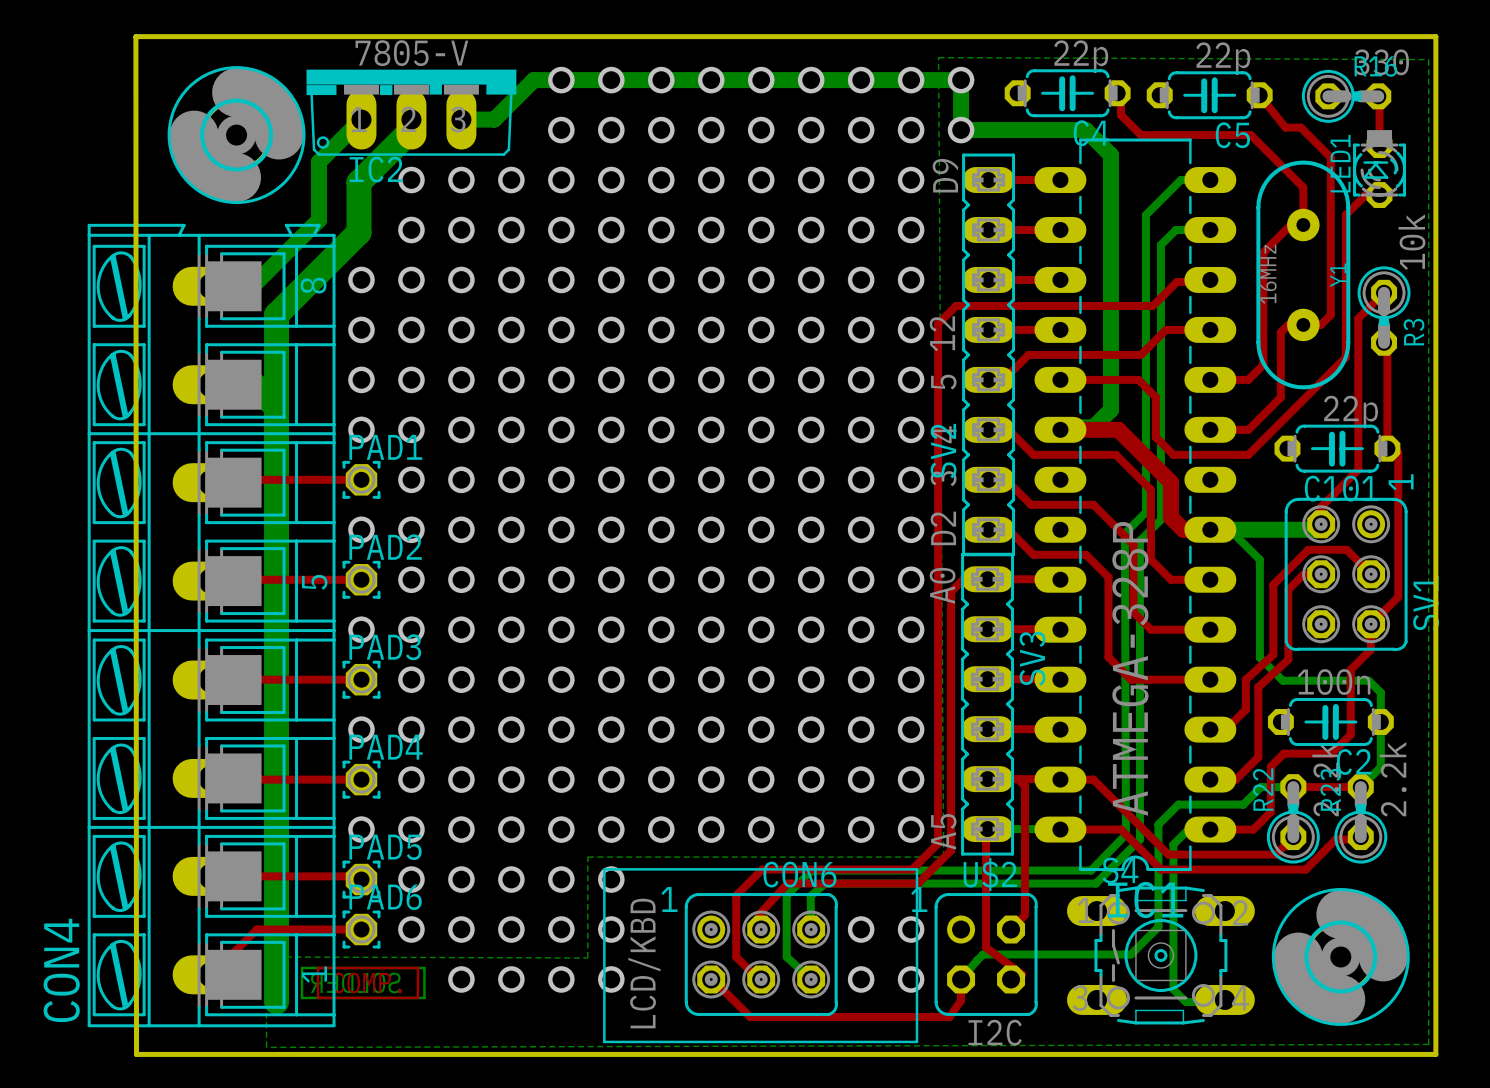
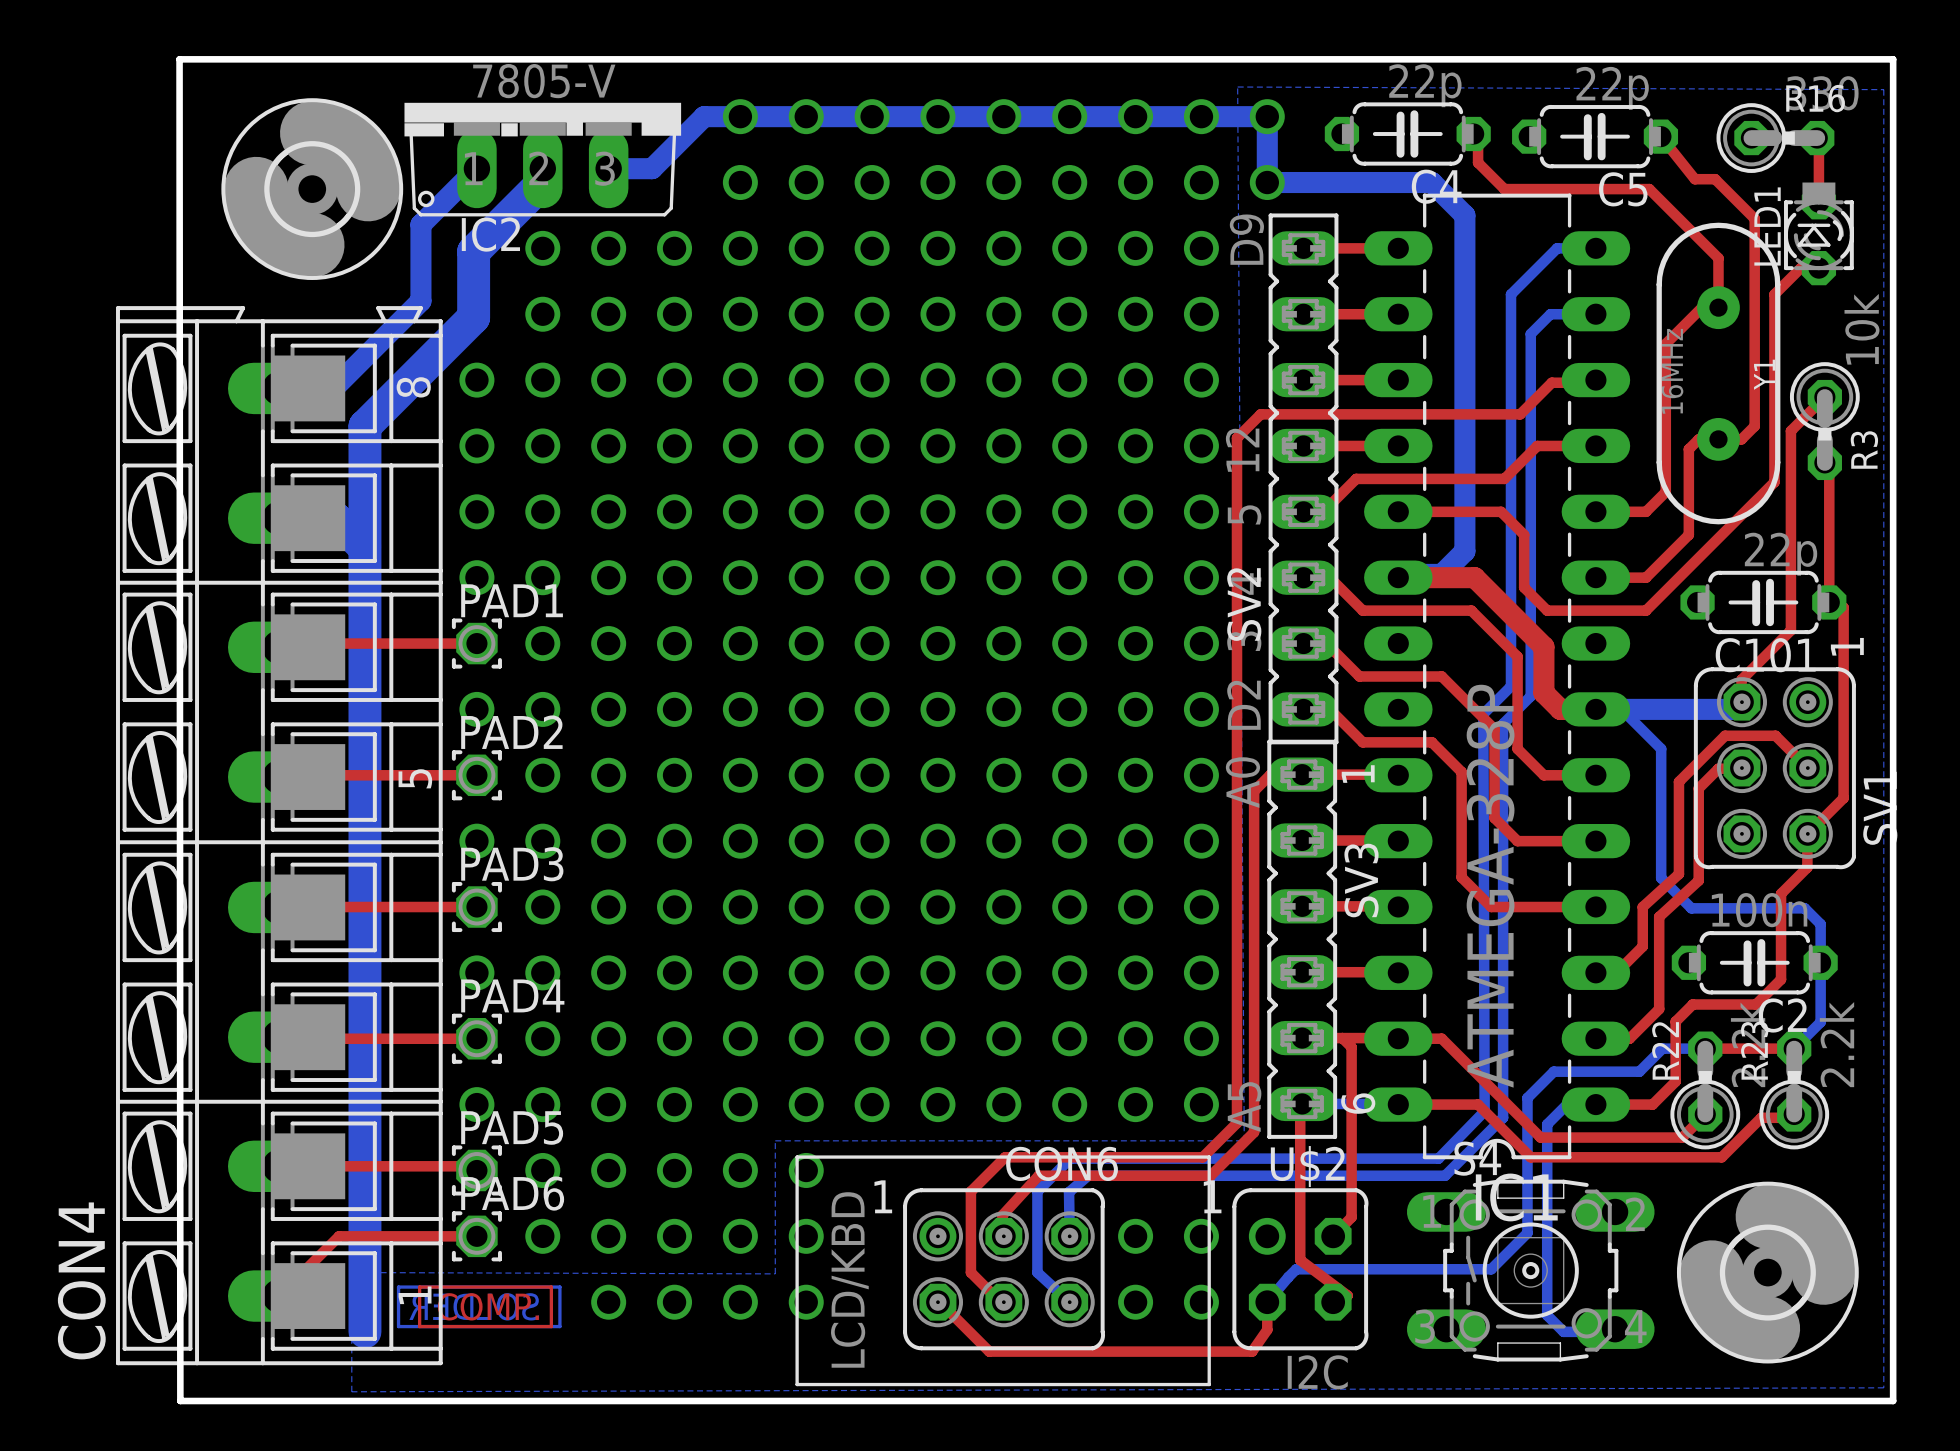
SV3 text: none -> 1 (1358, 774)
SV3 text: none -> 6 (1358, 1103)

